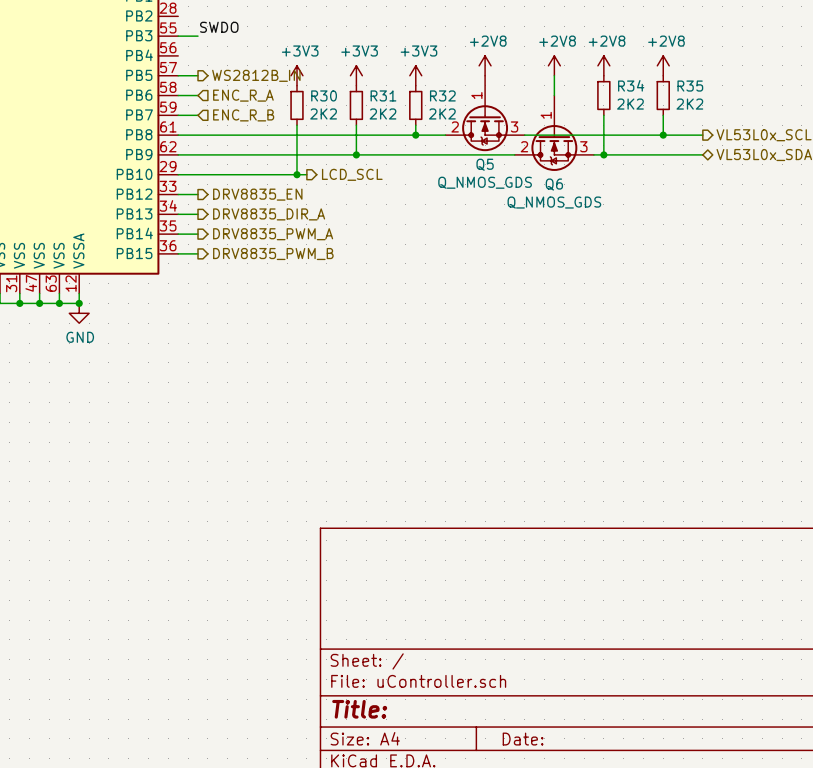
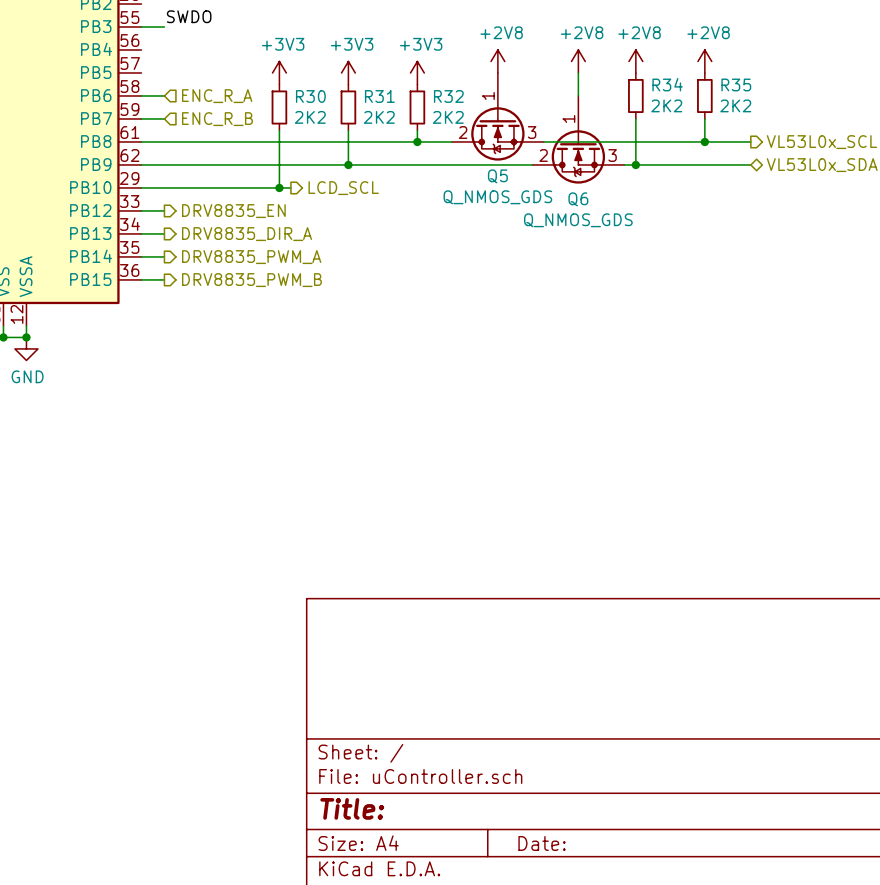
wire: (178, 75) (198, 75) -> none
hierarchical label: WS2812B_IN (256, 75) -> none

